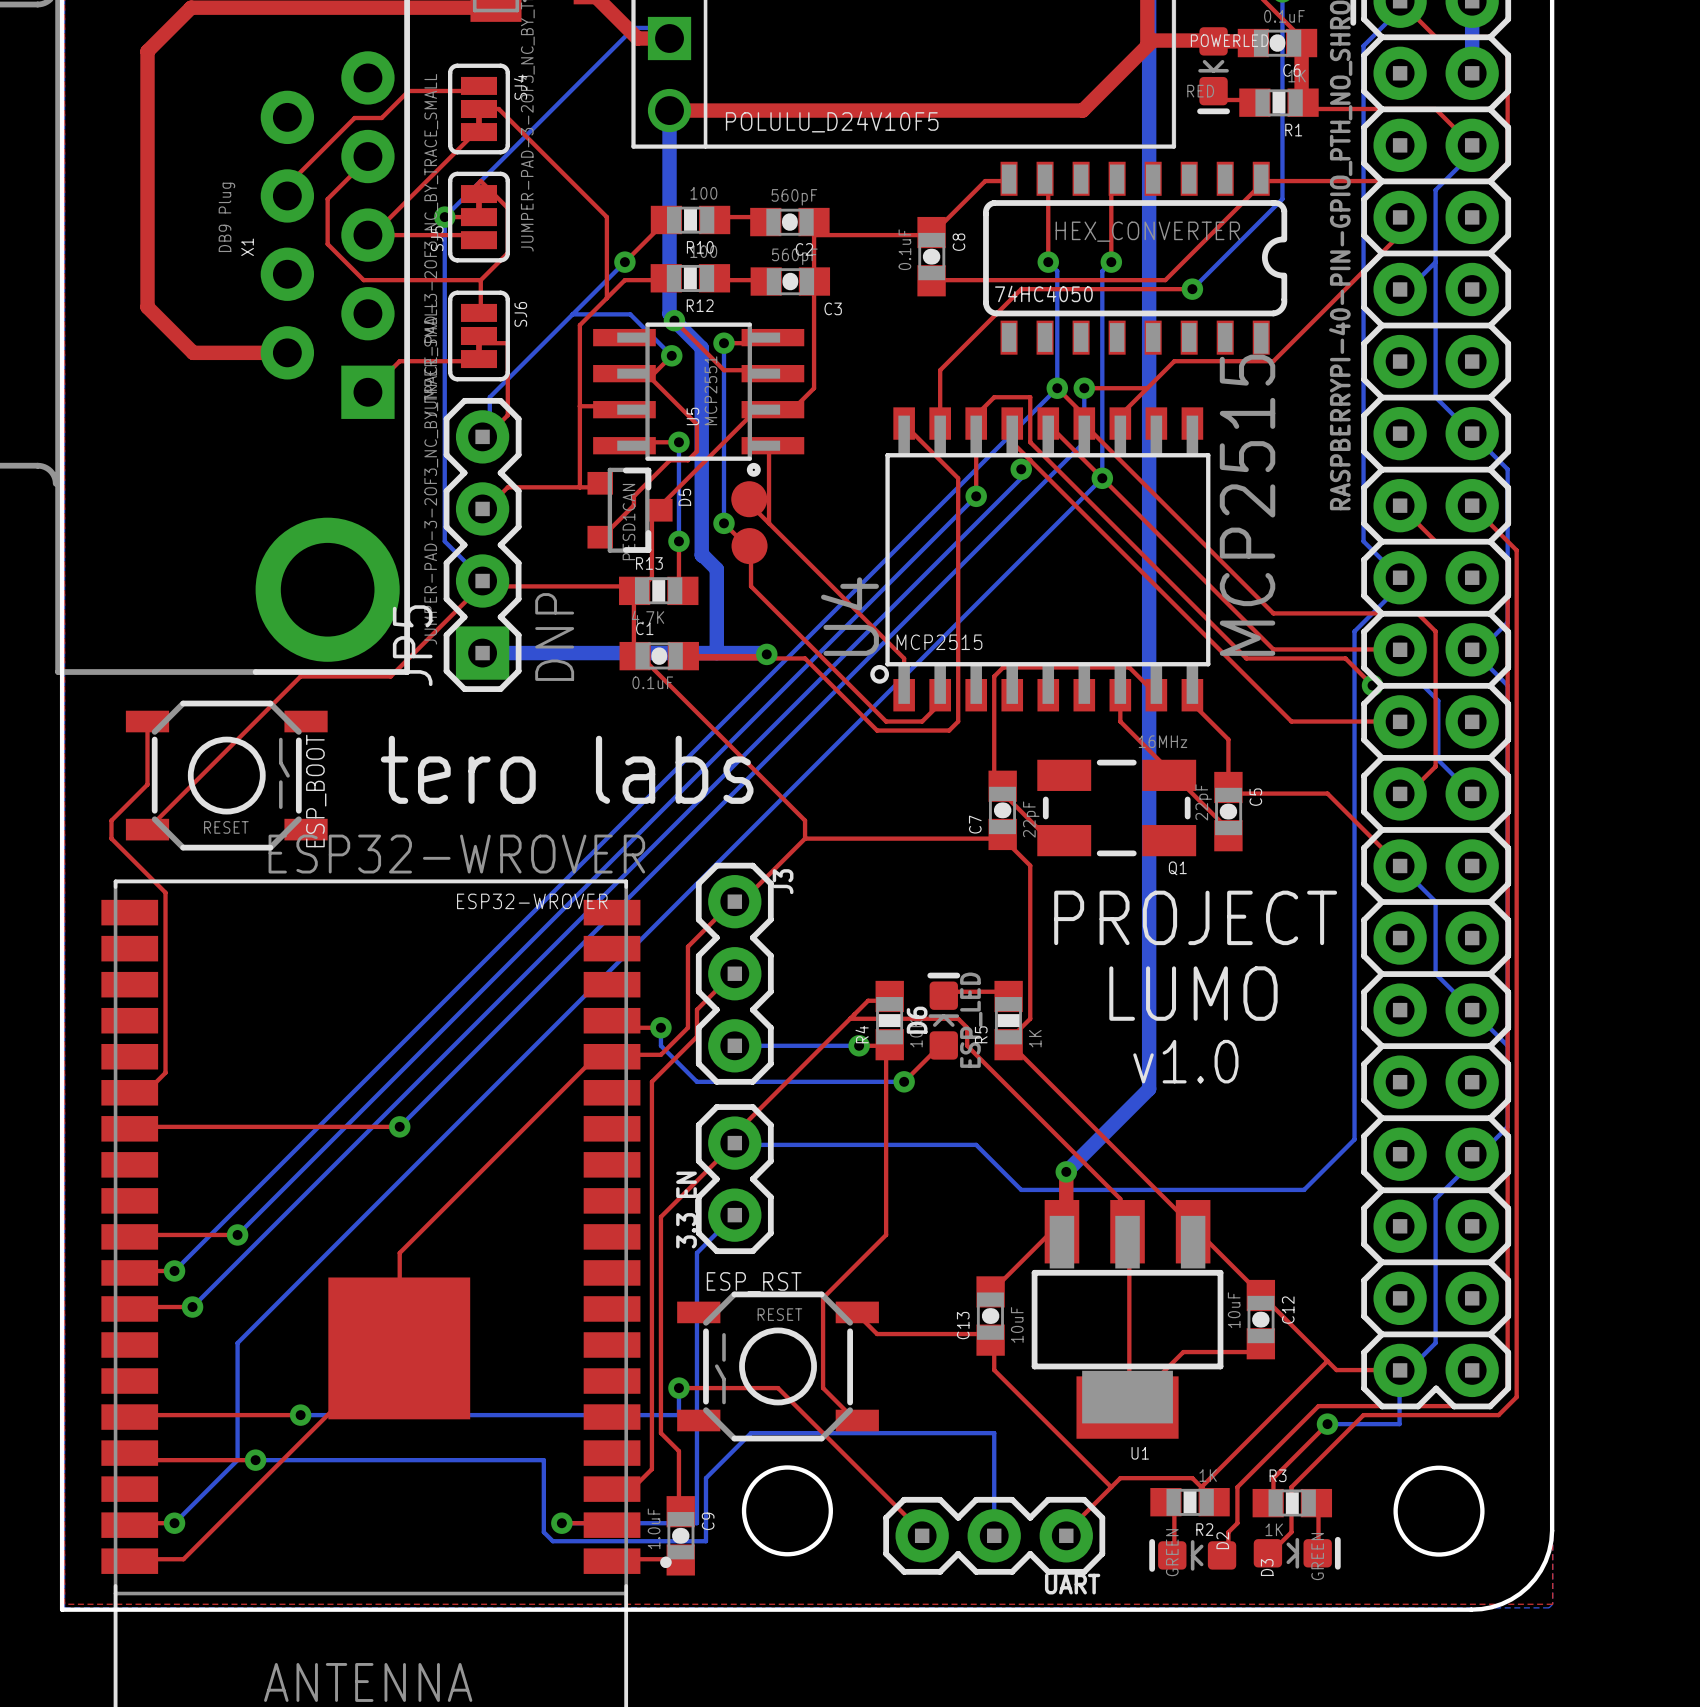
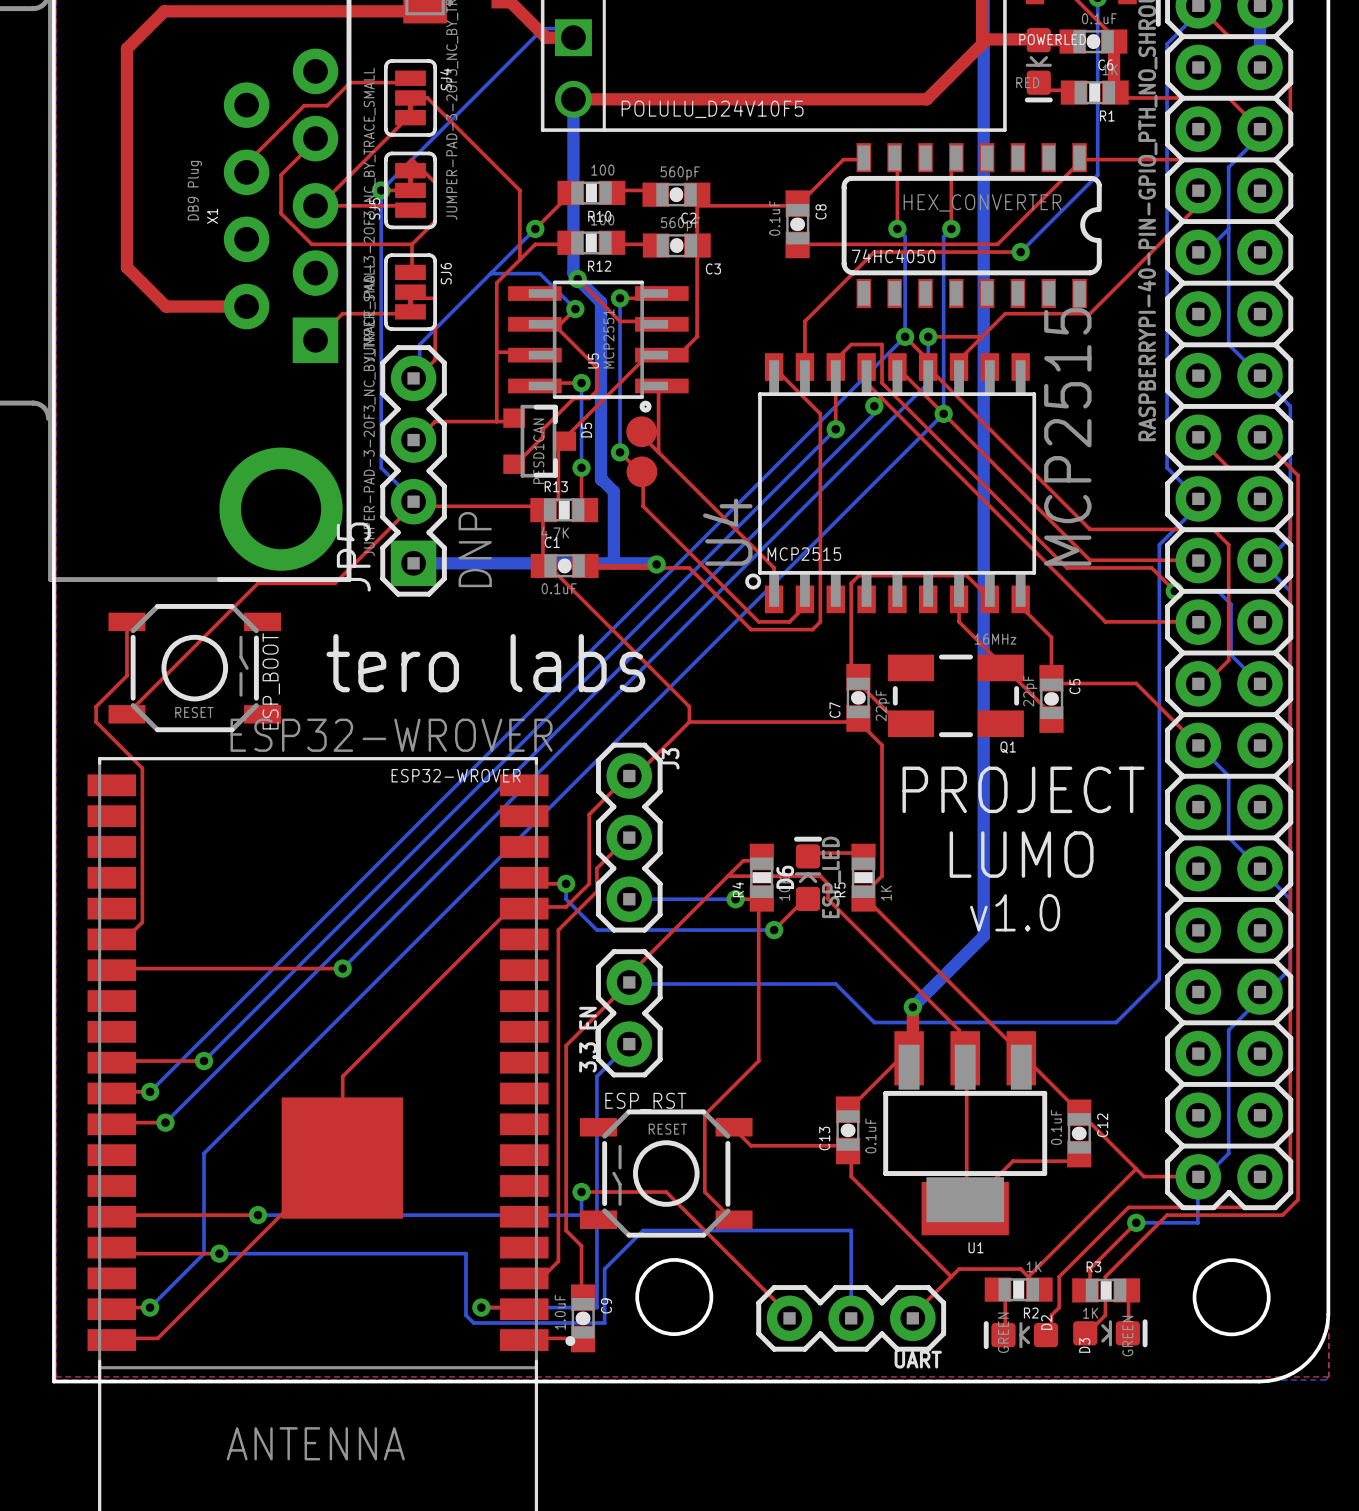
C12 value: 10uF (1234, 1310) -> 0.1uF (1056, 1127)
C13 value: 10uF (1017, 1324) -> 0.1uF (870, 1135)

